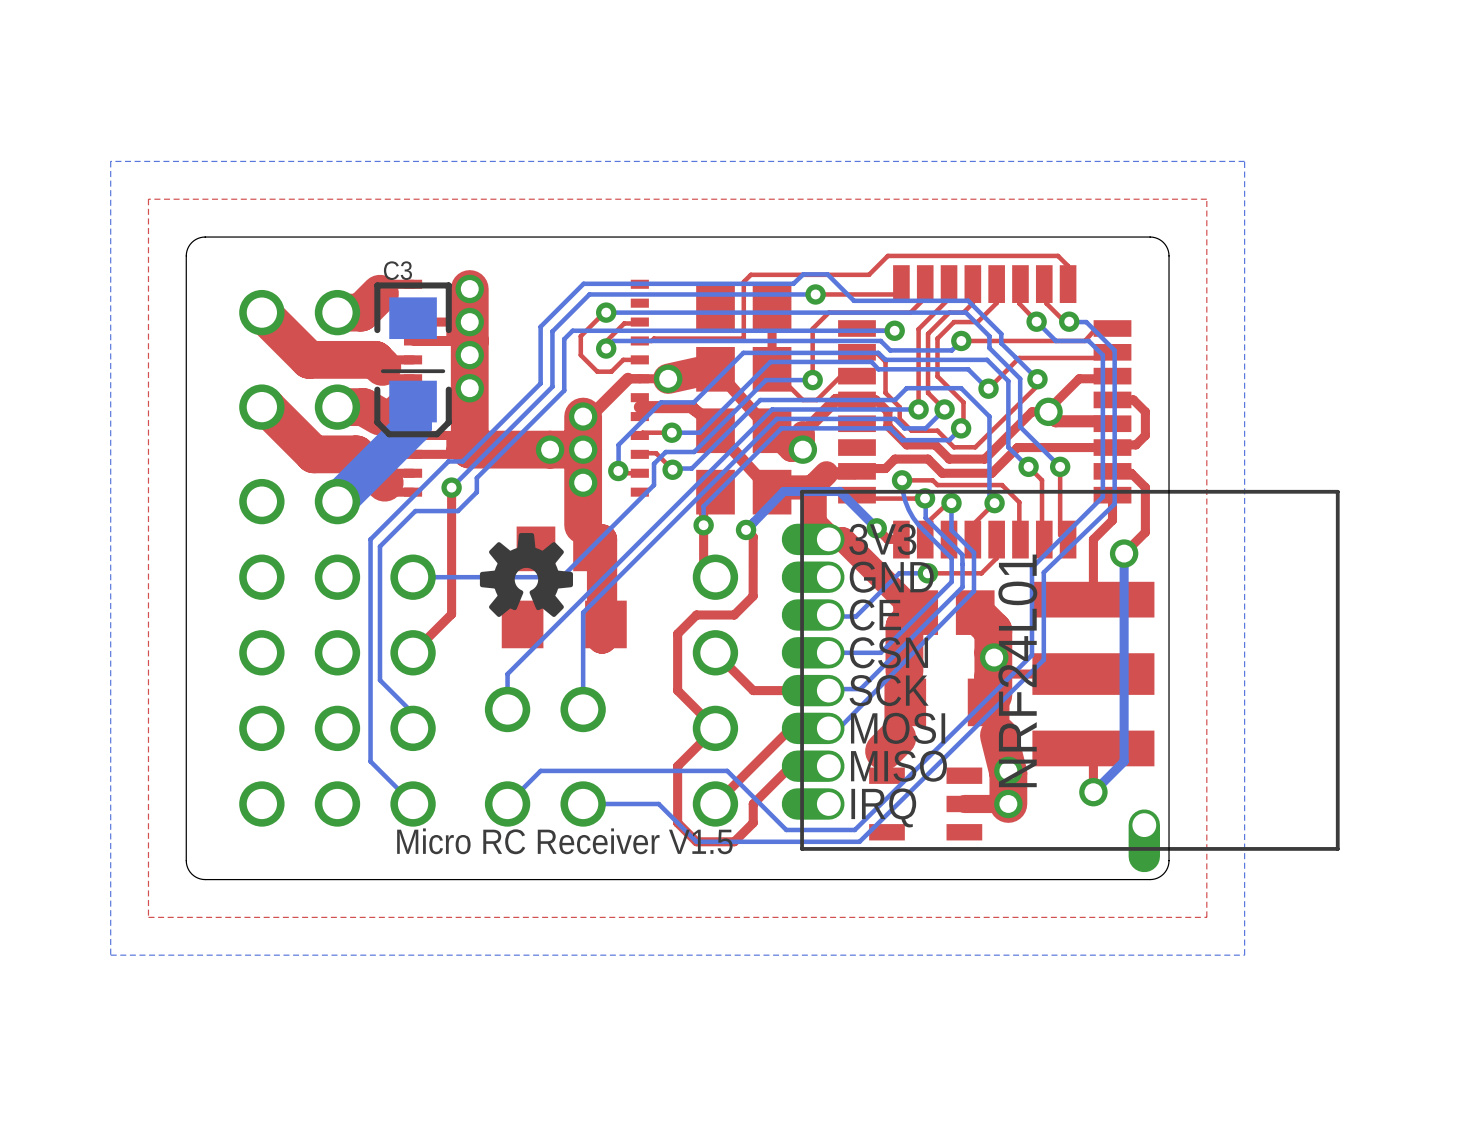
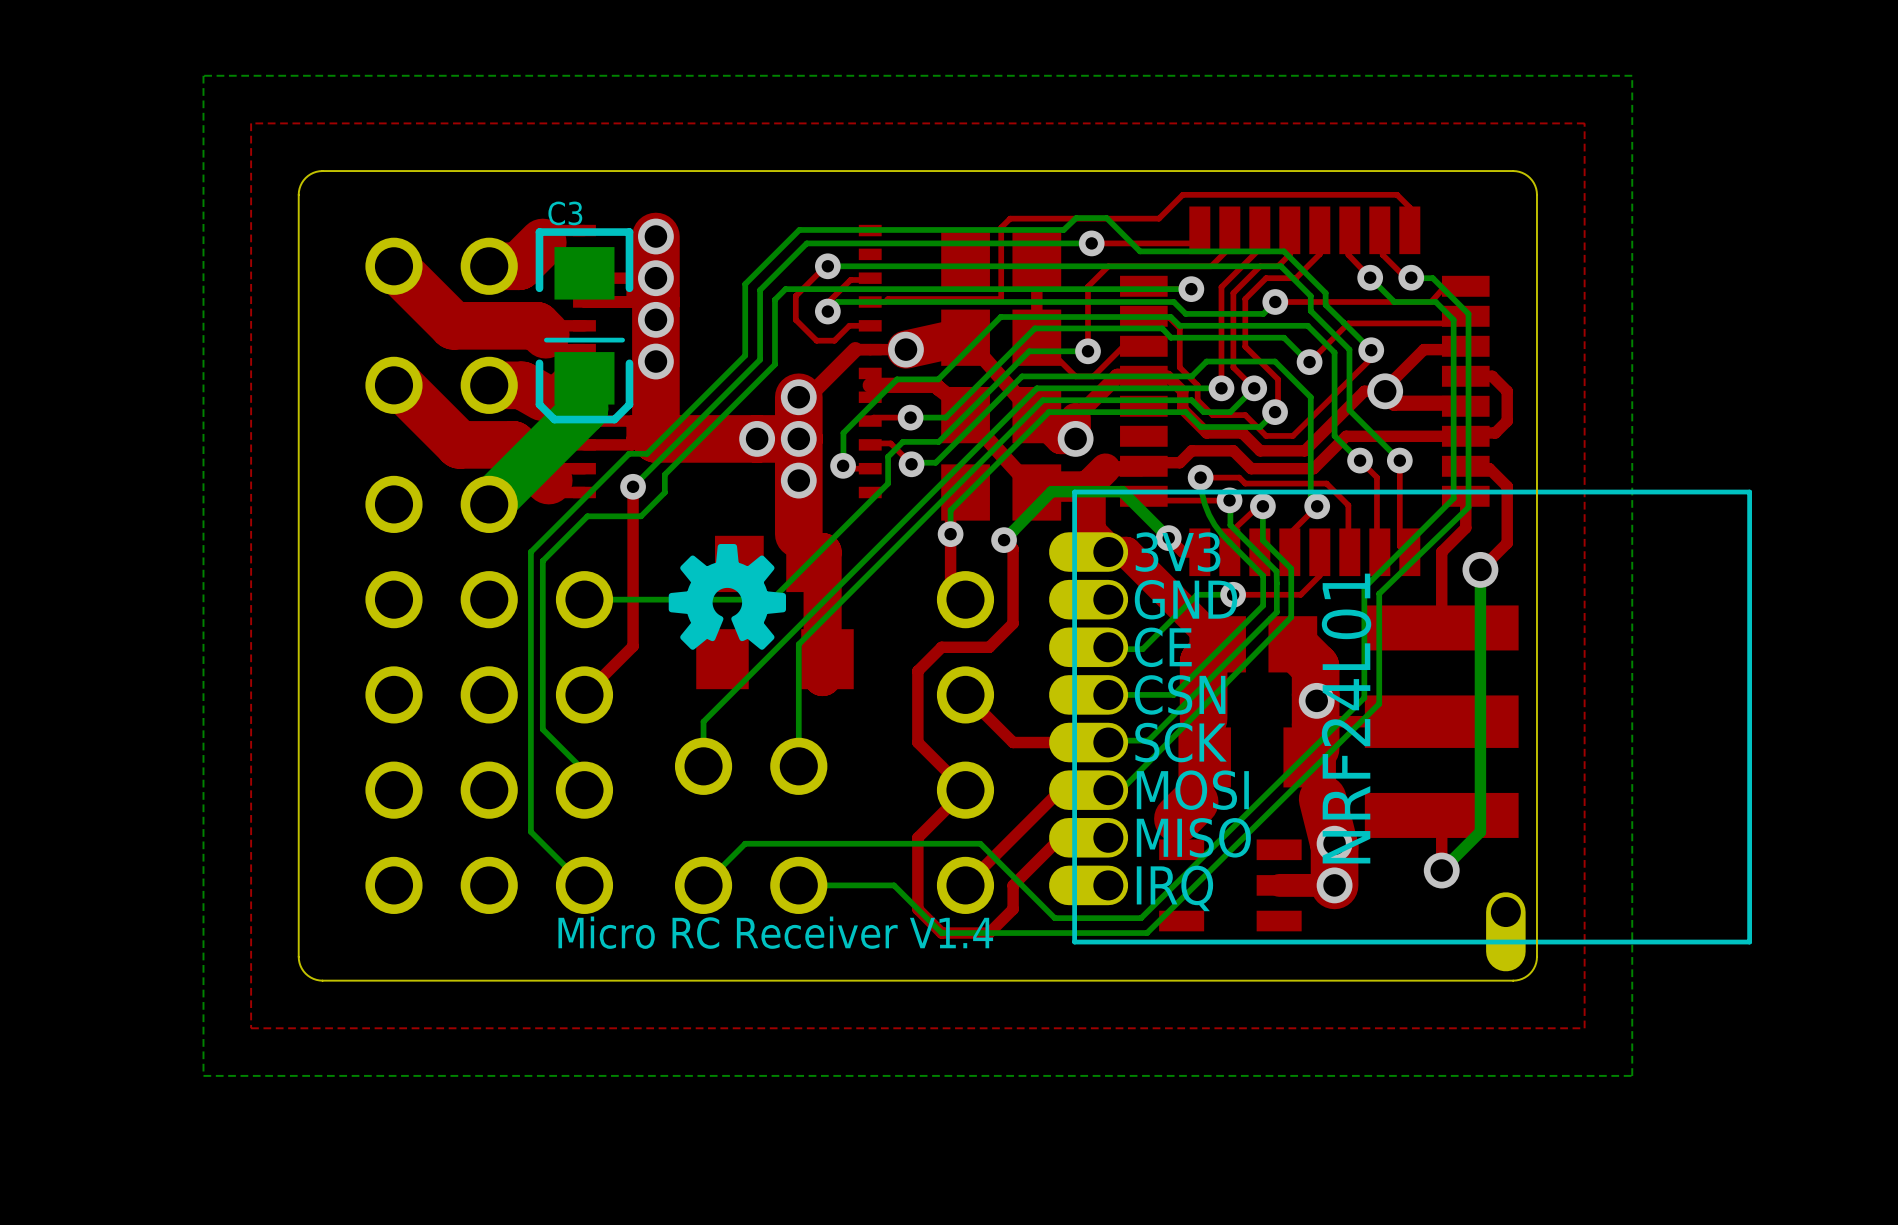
text: Micro RC Receiver V1.5 (564, 841) -> Micro RC Receiver V1.4 (775, 932)

